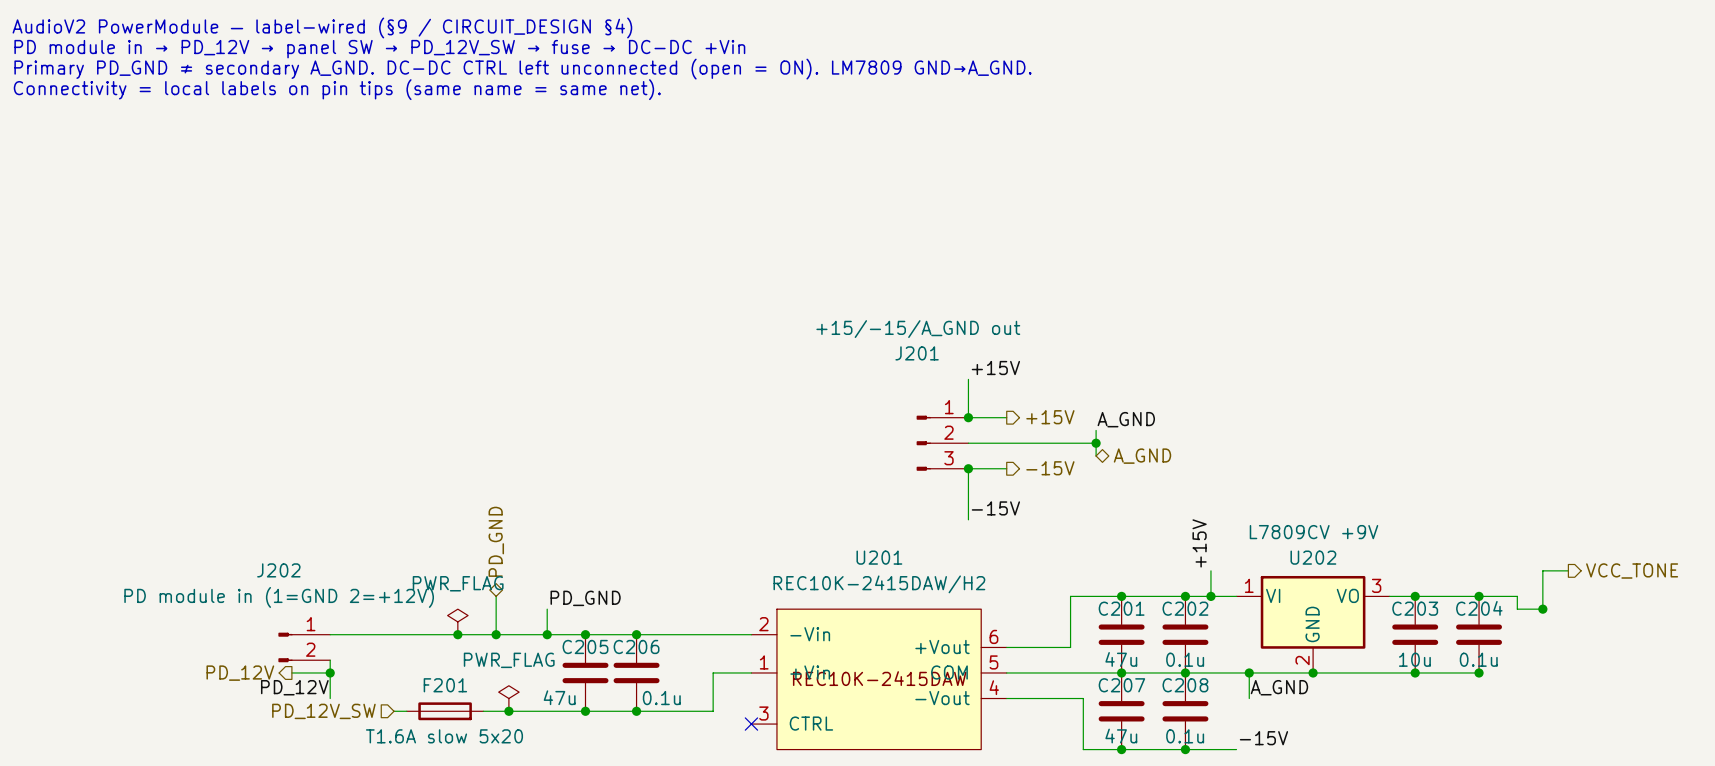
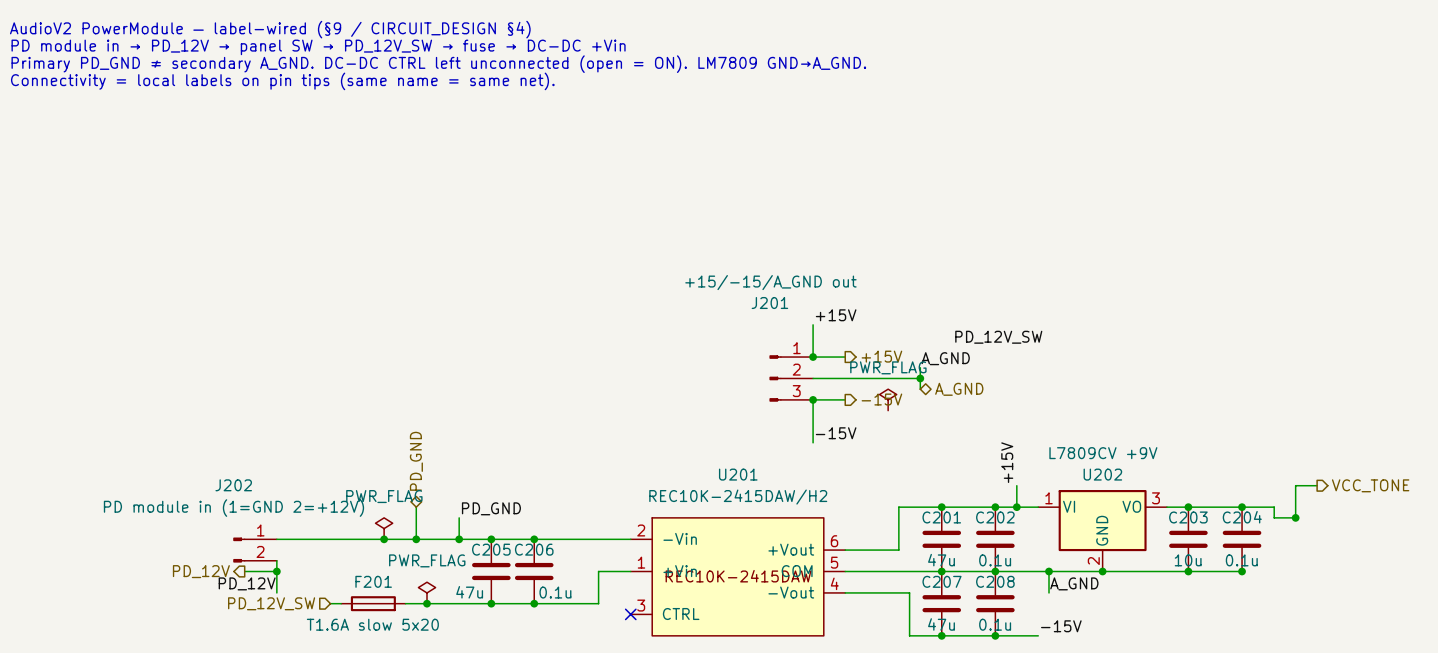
label: none -> PD_12V_SW (998, 337)
power symbol: none -> PWR_FLAG (888, 399)

